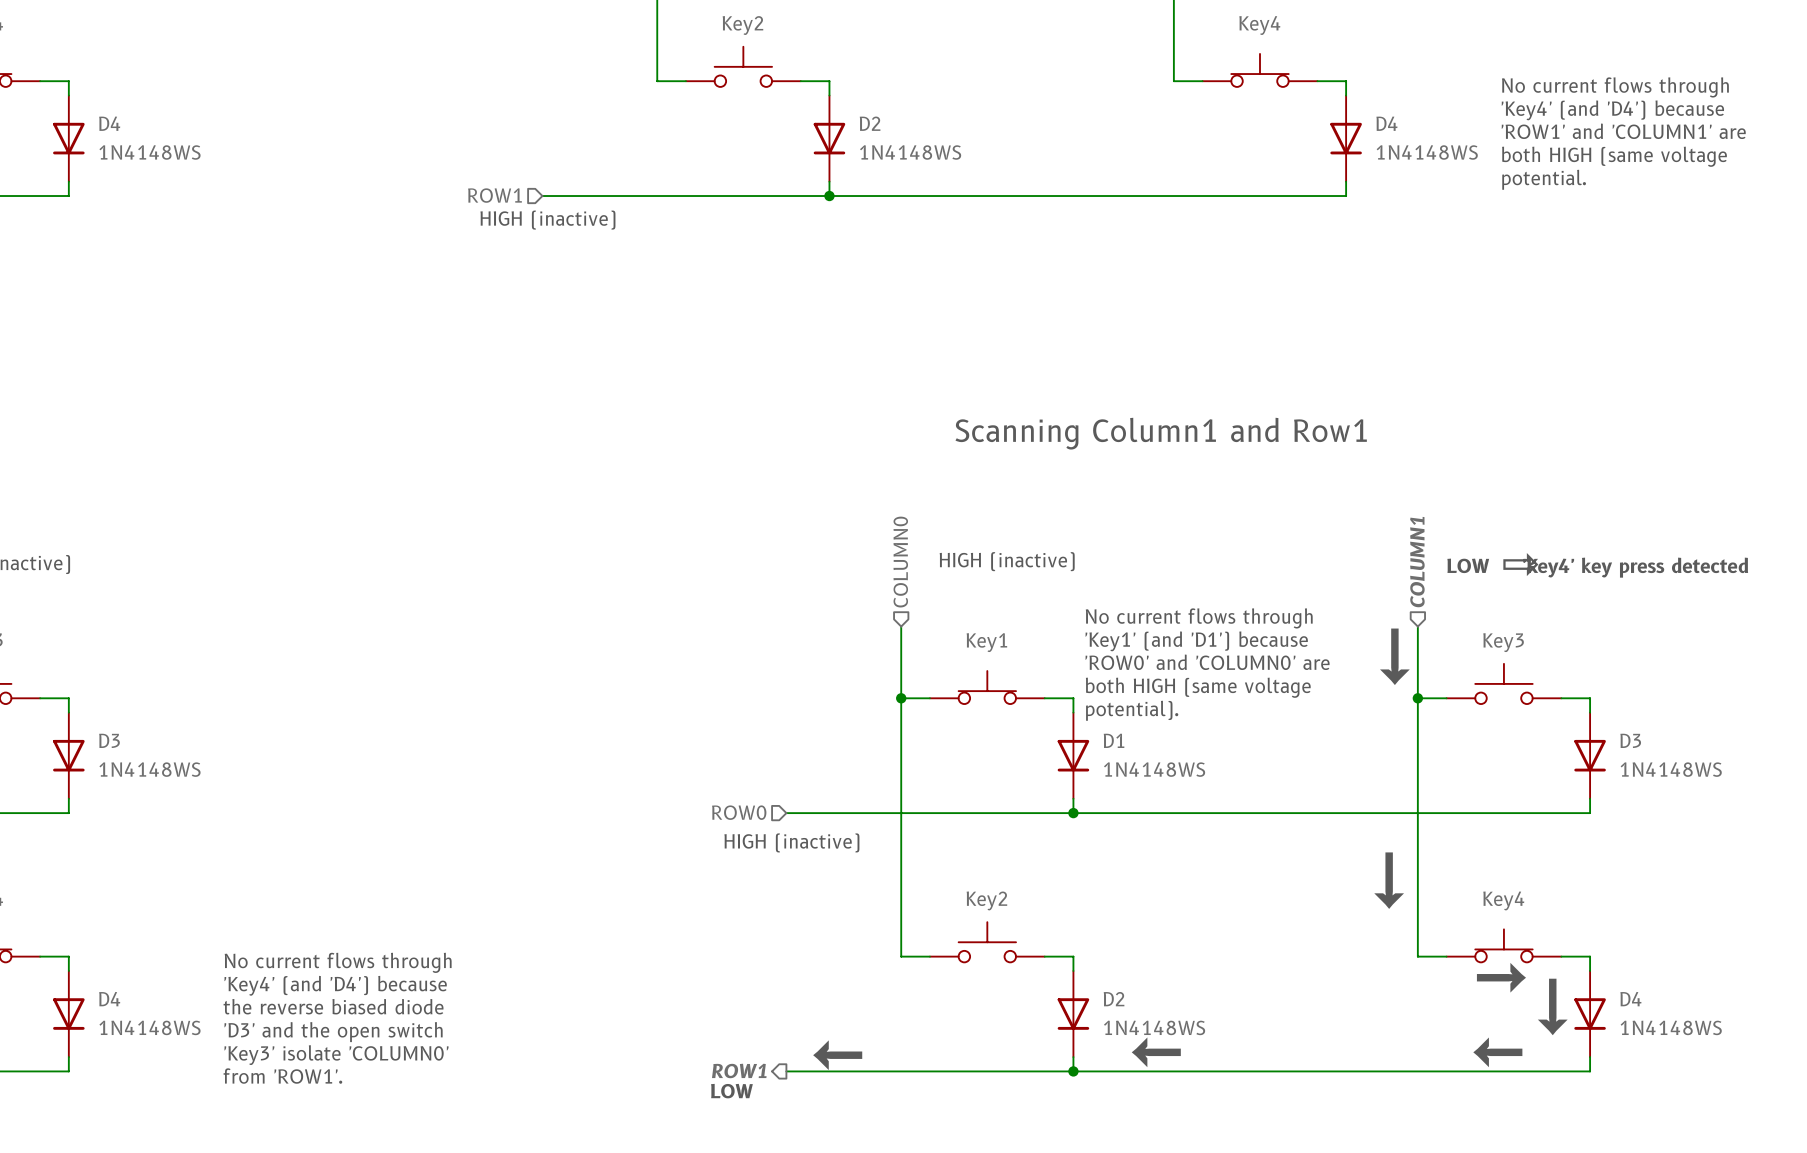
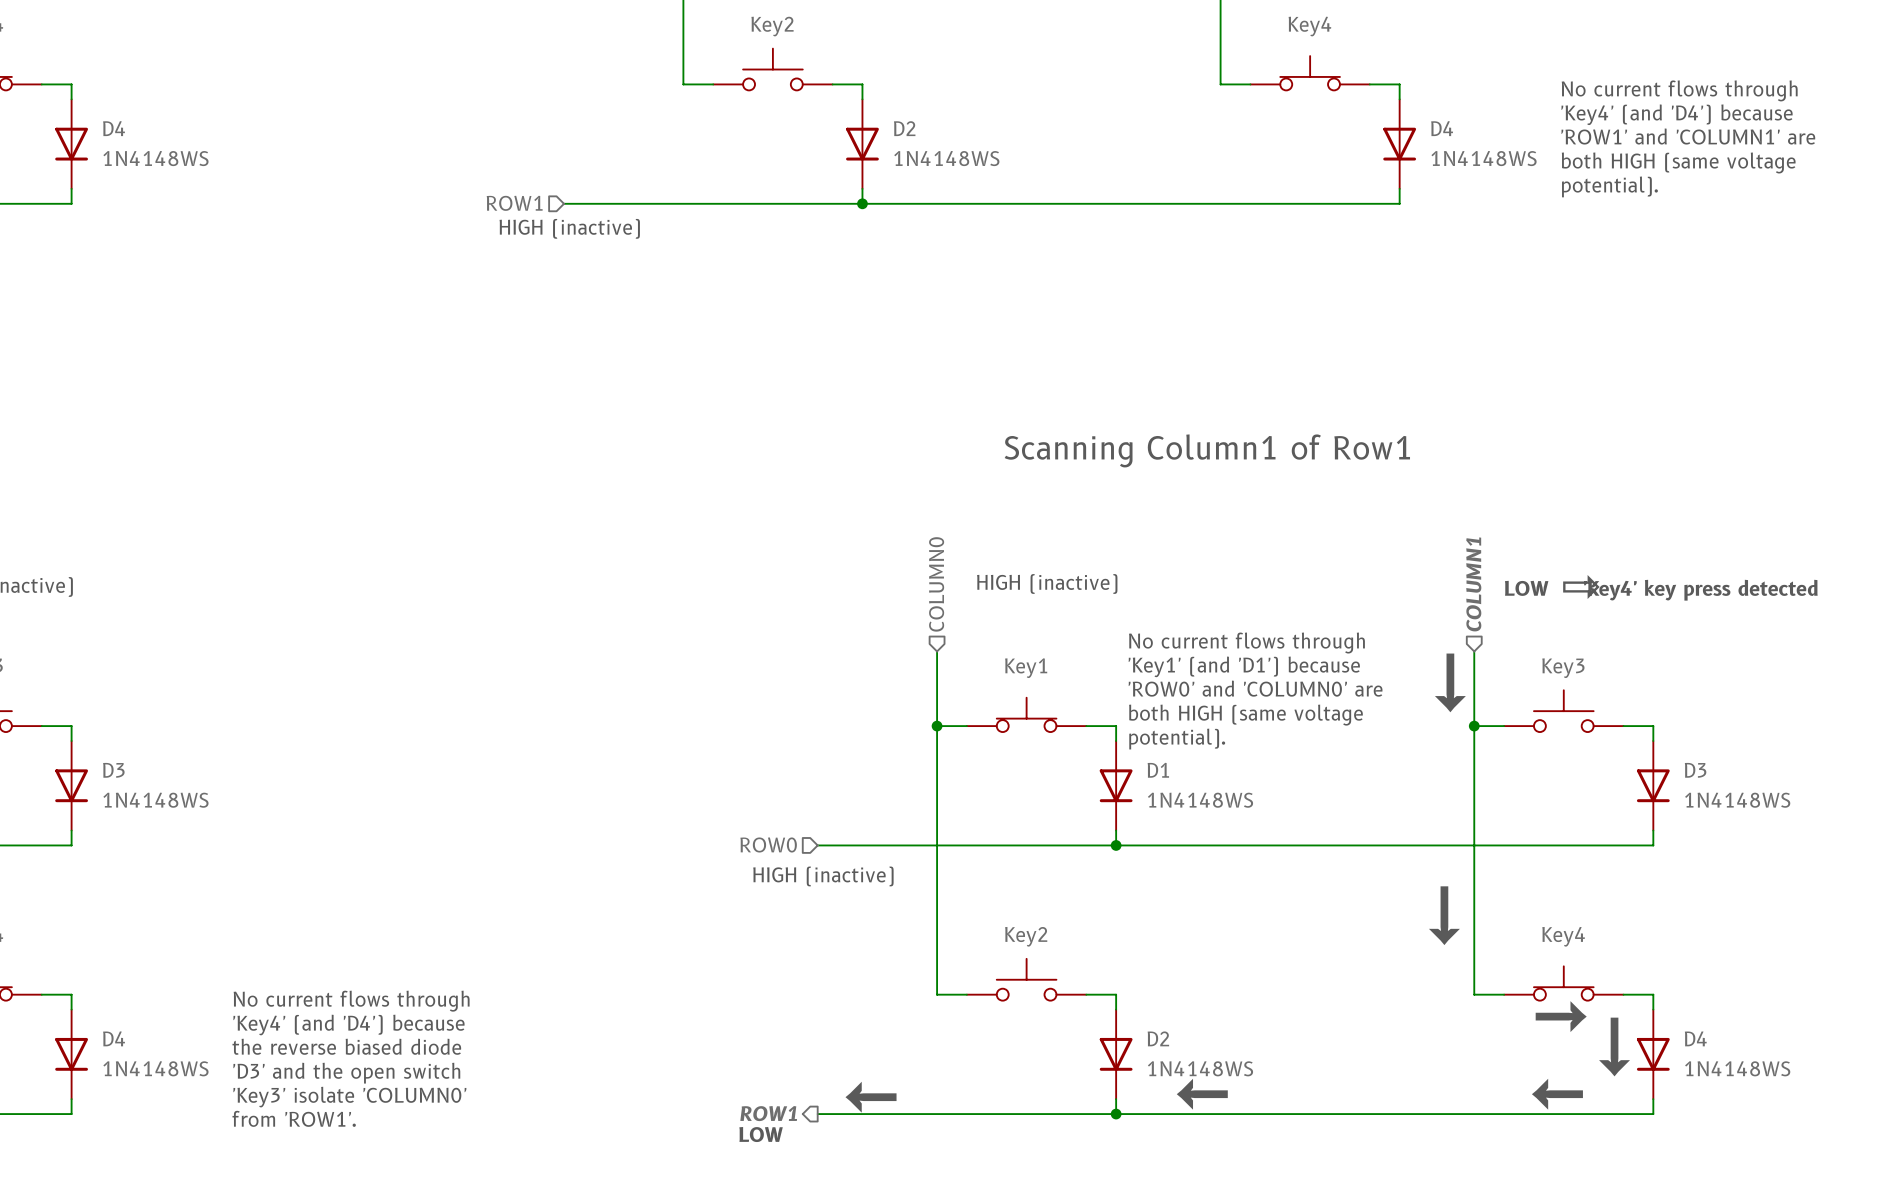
text: potential. (1544, 179) -> potential). (1609, 186)
text: Scanning Column1 and Row1 (1161, 433) -> Scanning Column1 of Row1 (1207, 450)

